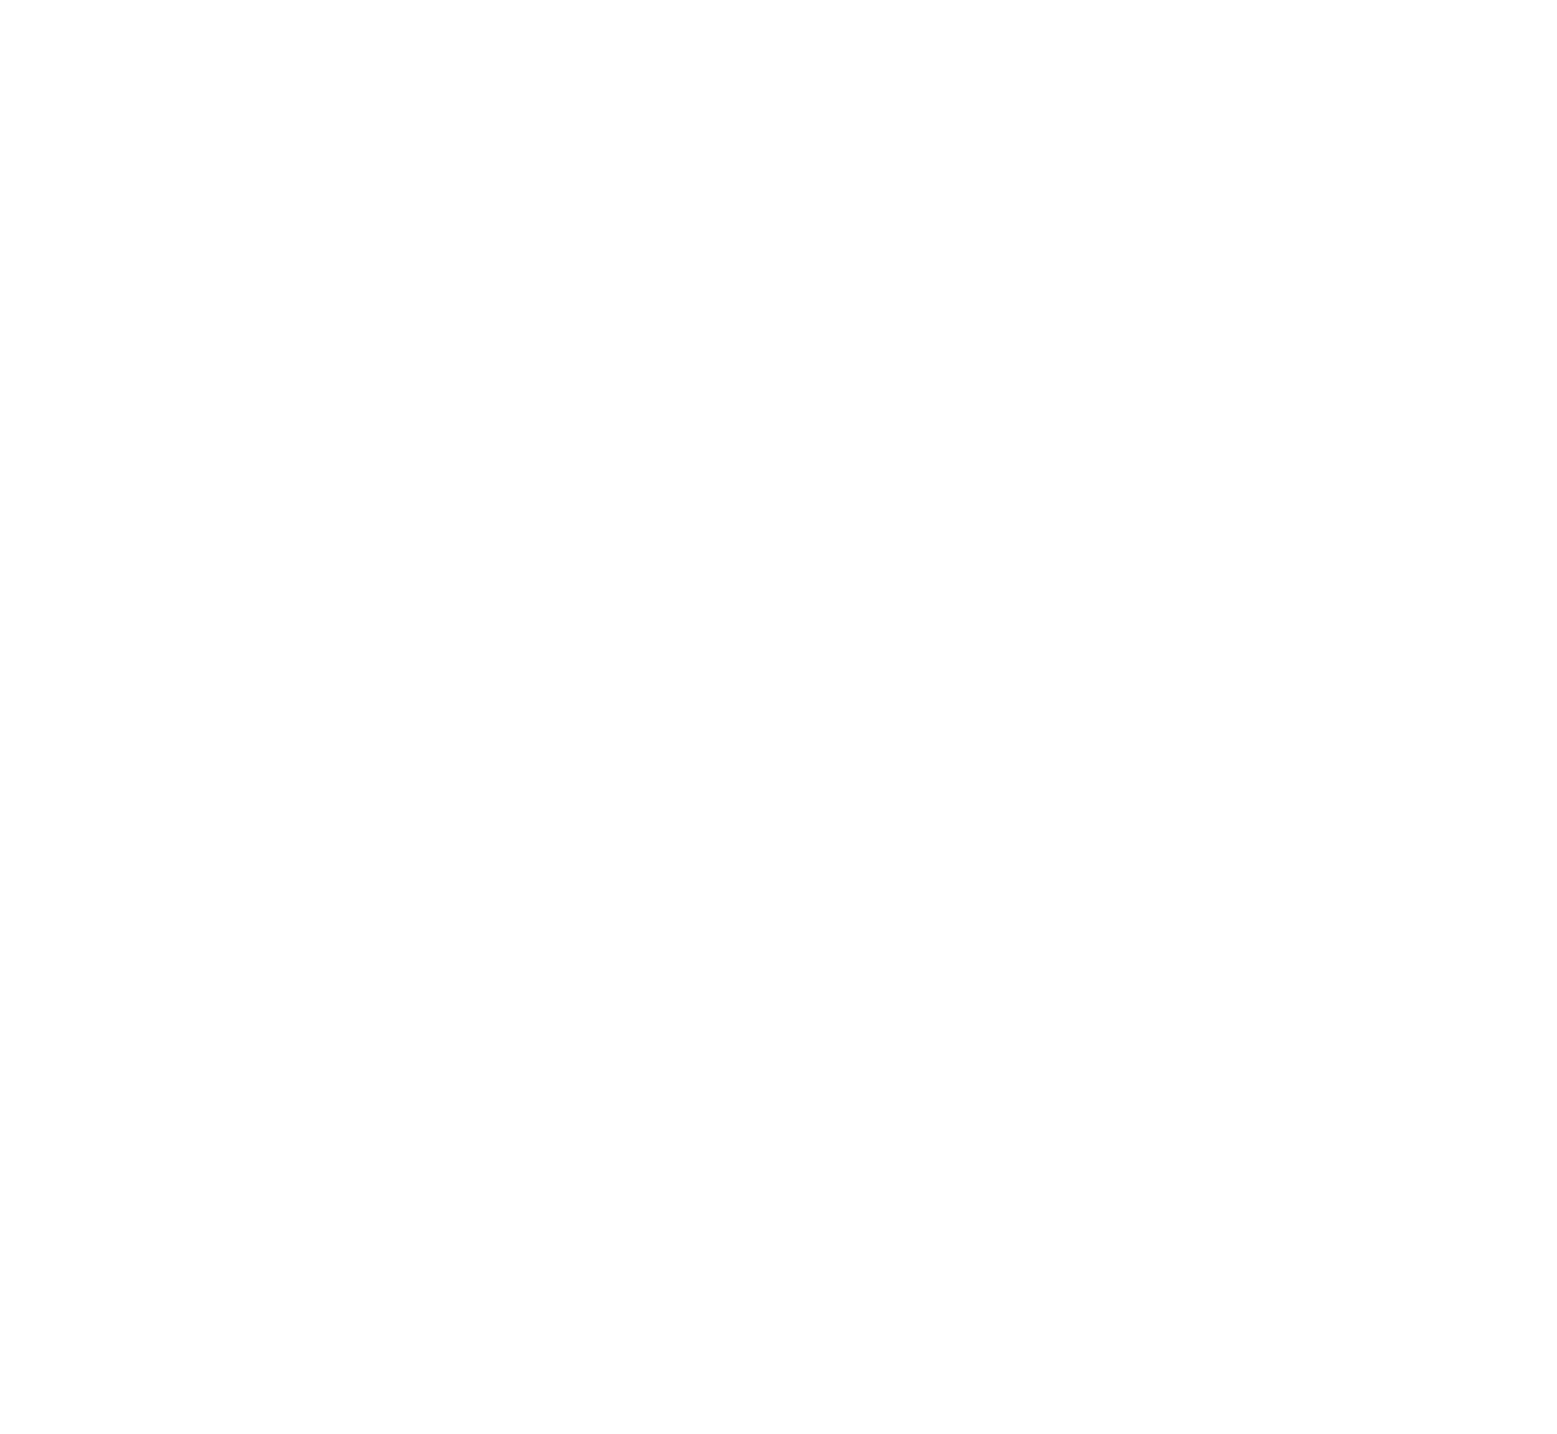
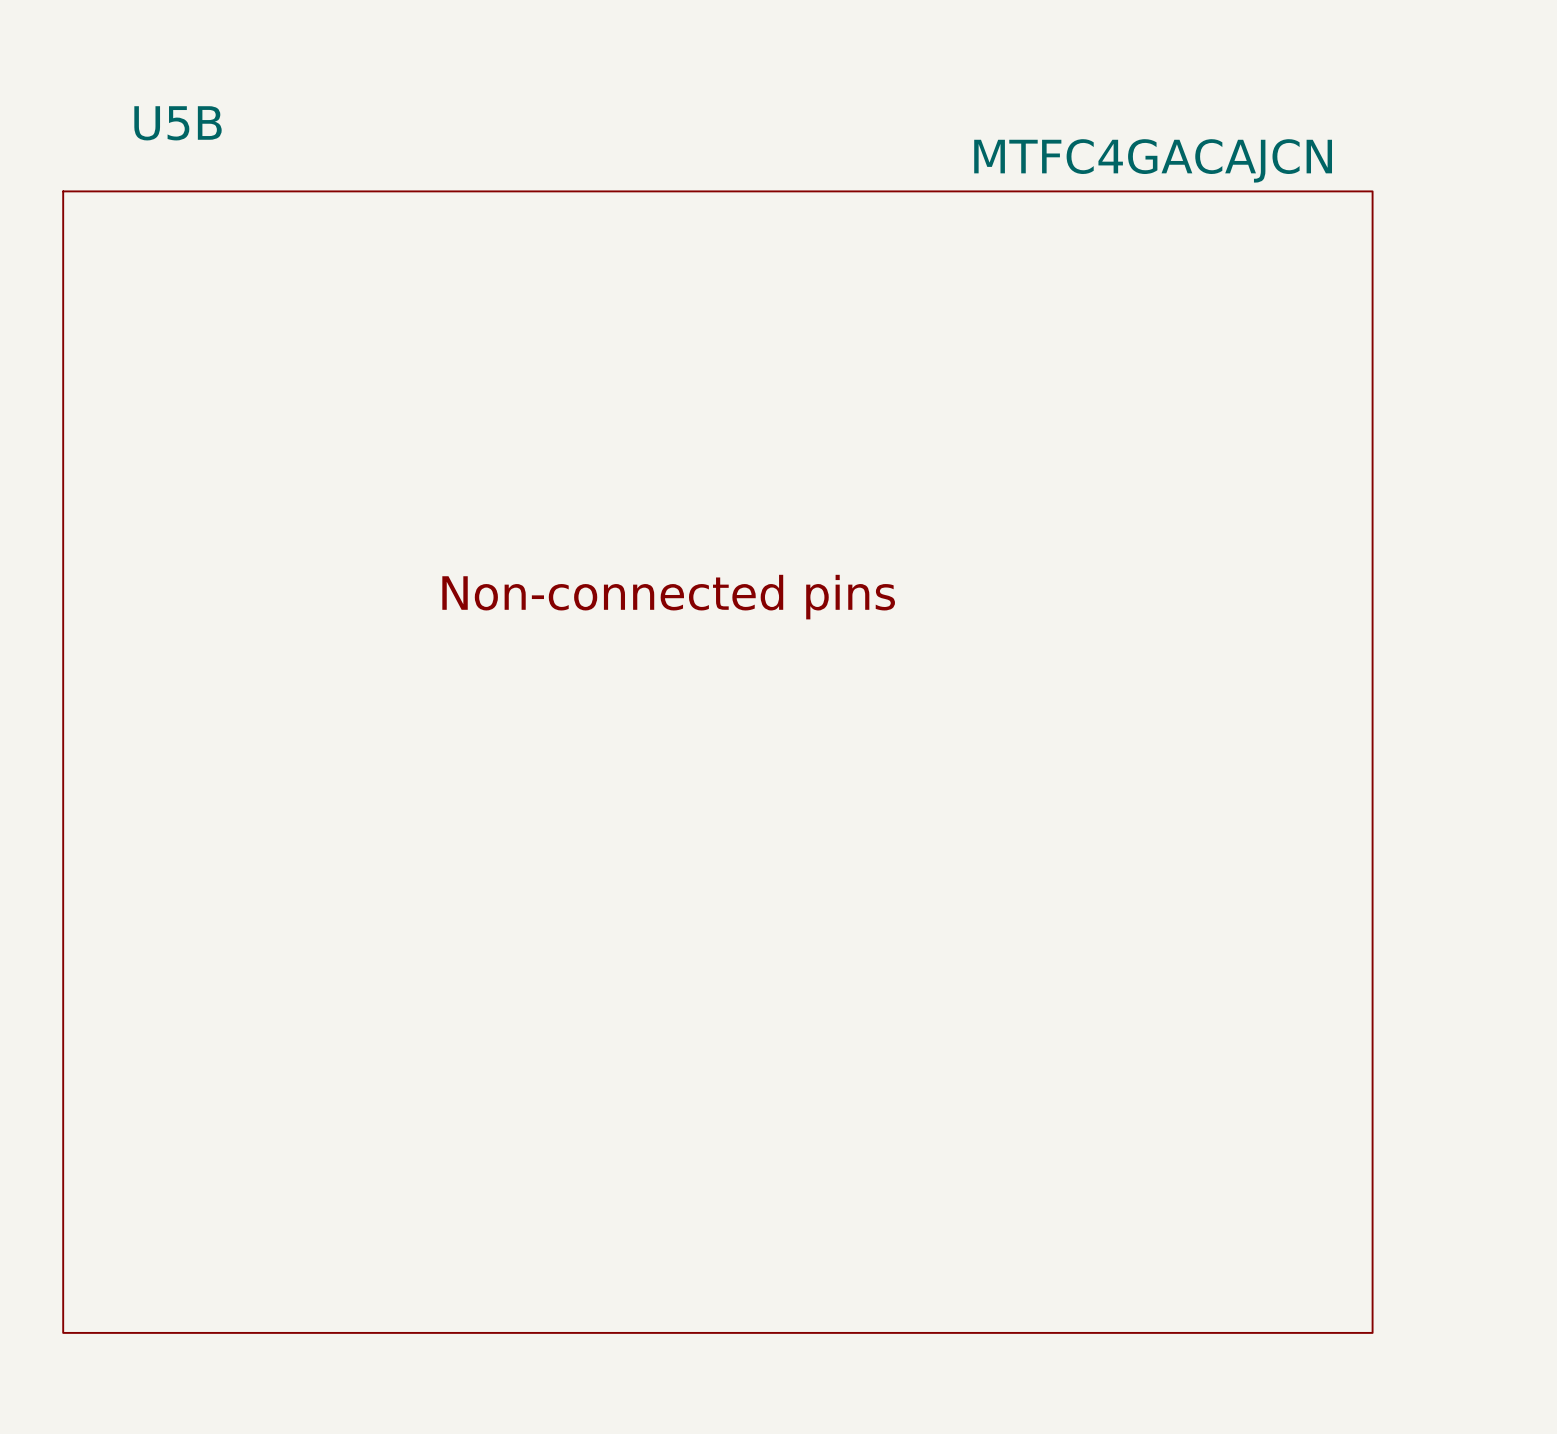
U5B: none -> MTFC4GACAJCN (717, 762)

